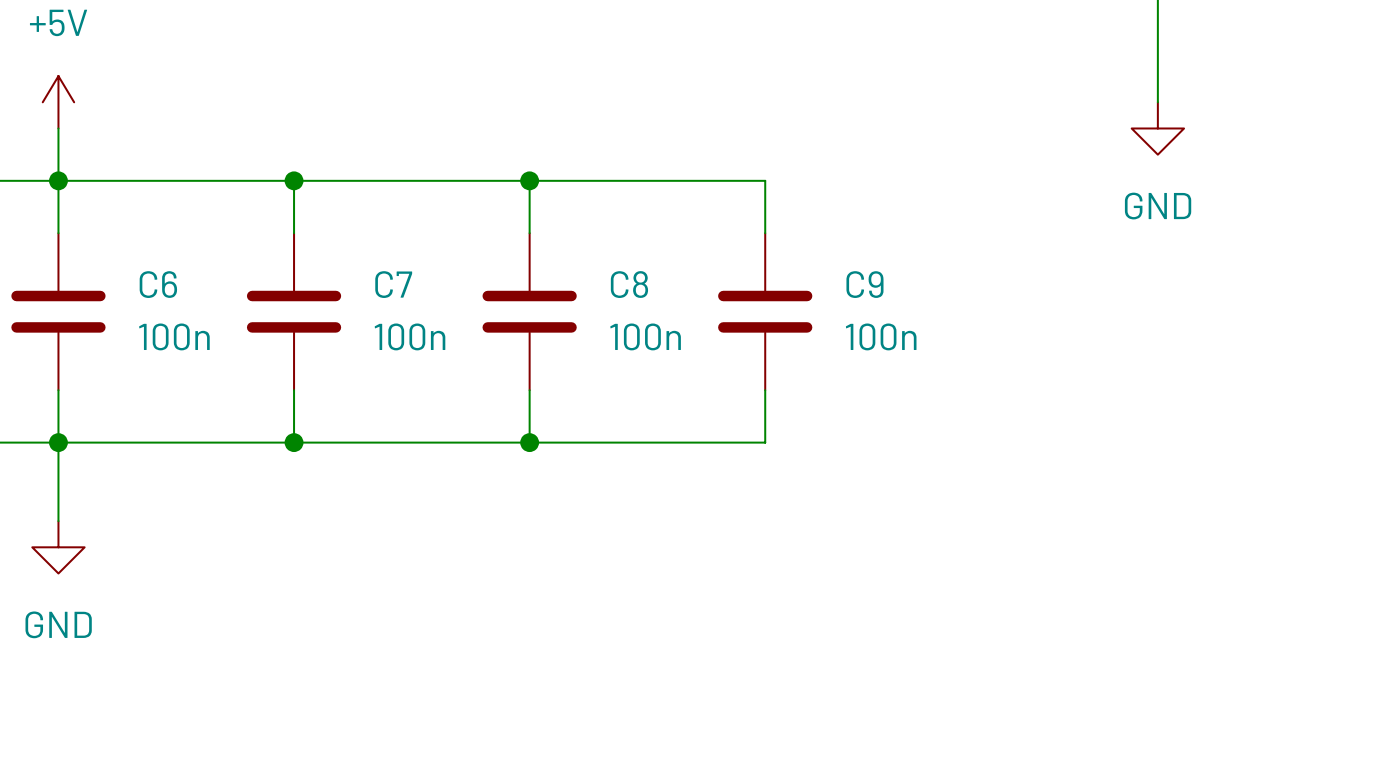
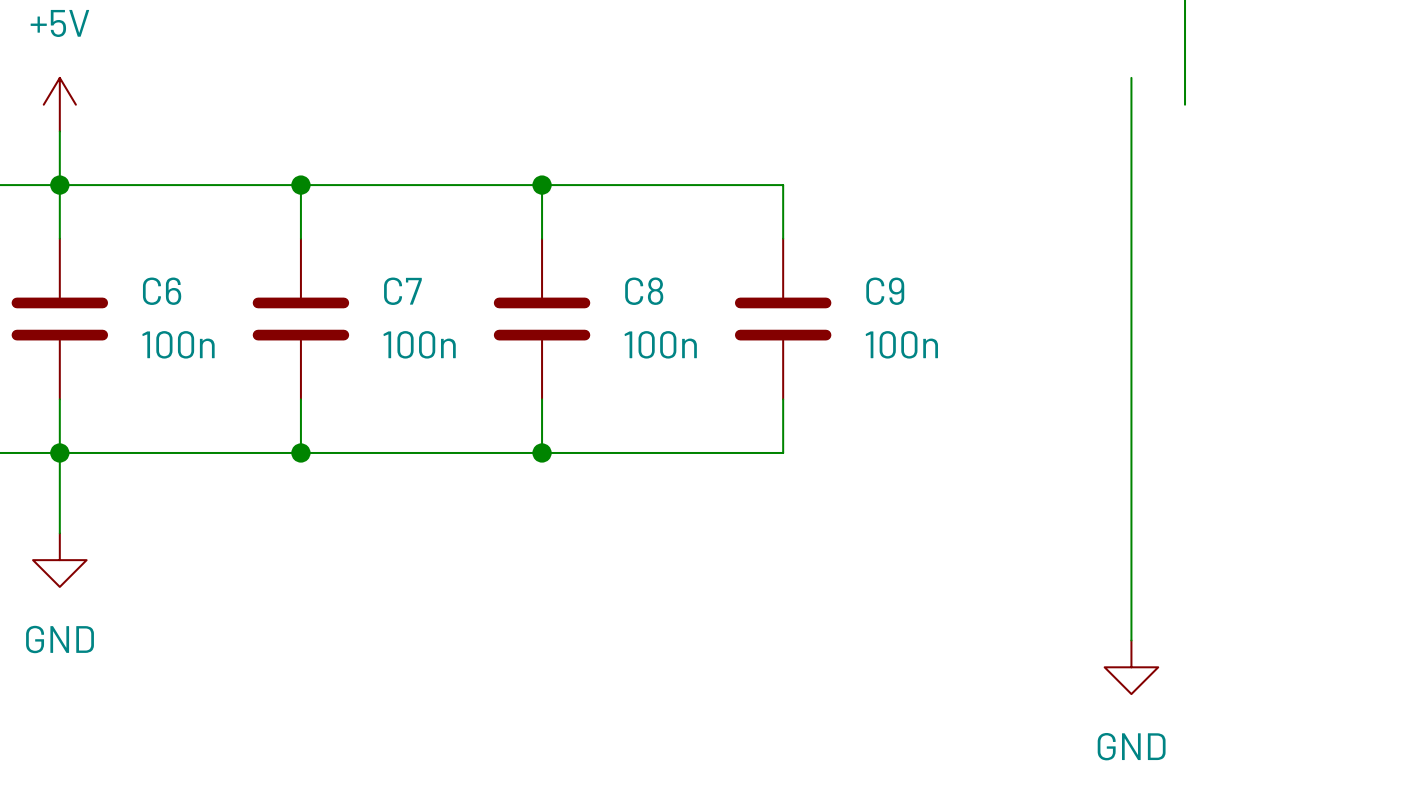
wire: none -> (1131, 77) (1131, 640)
power symbol: GND (1157, 128) -> none
power symbol: none -> GND (1131, 667)

